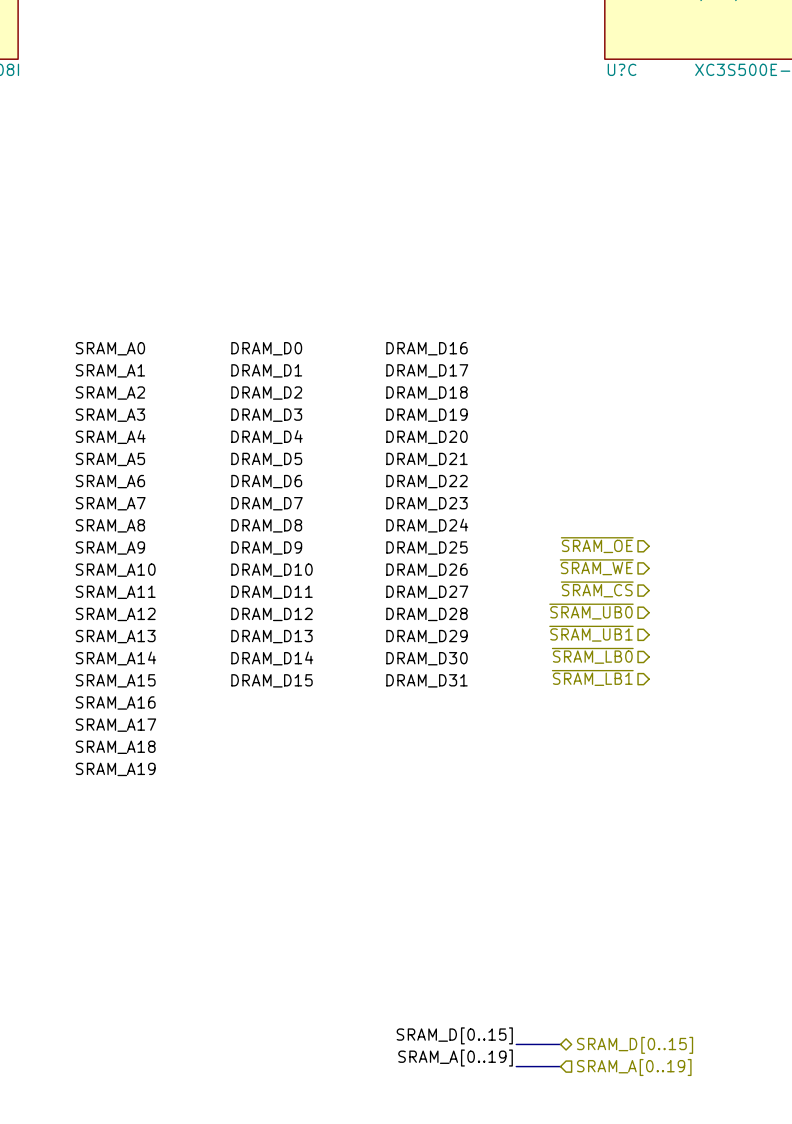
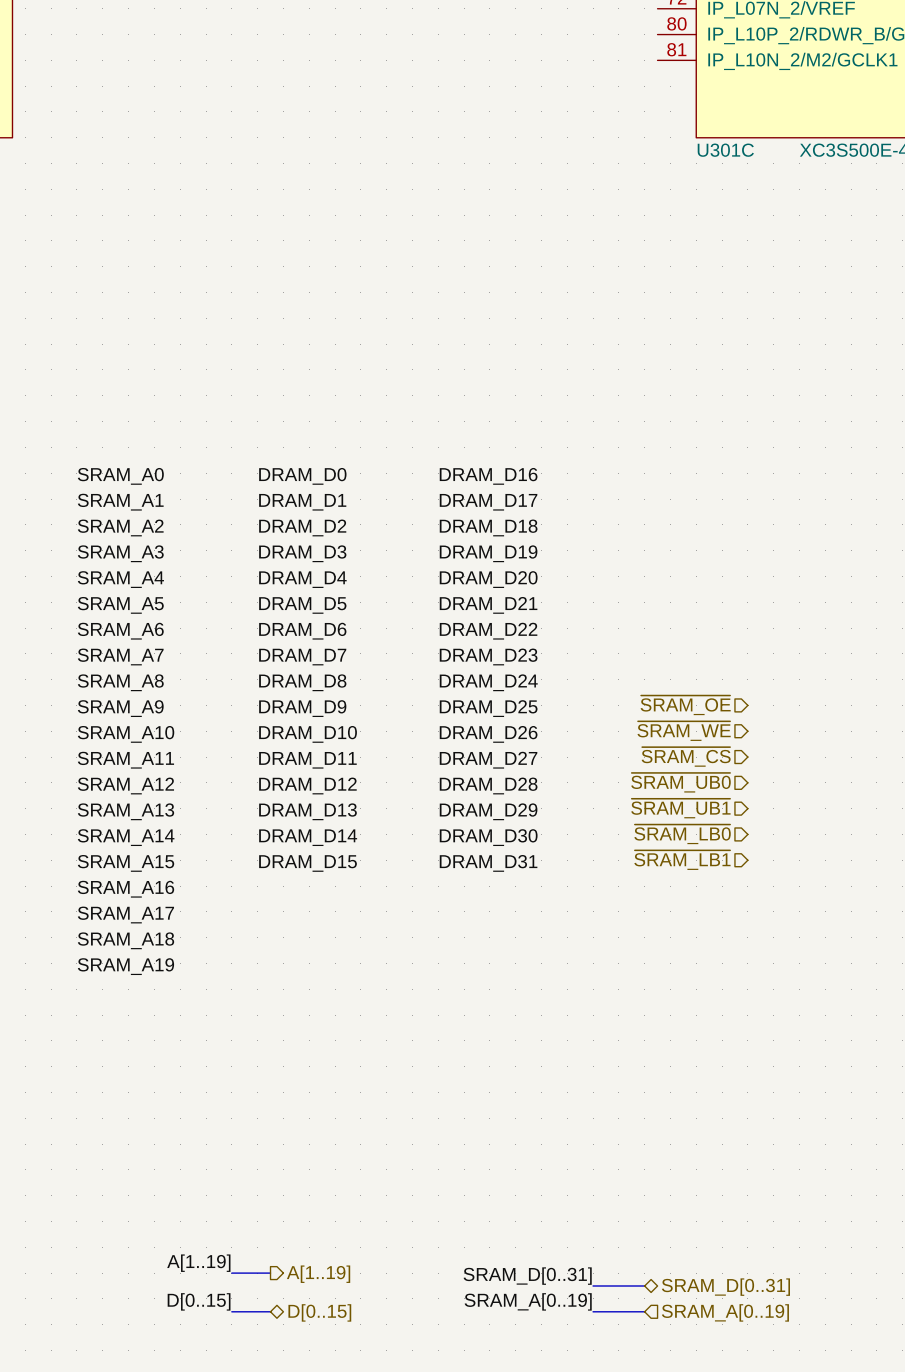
U?C name: U?C (622, 69) -> U301C (725, 150)
label: none -> A[1..19] (198, 1263)
bus: none -> (231, 1273) (270, 1273)
hierarchical label: none -> A[1..19] (318, 1274)
label: SRAM_D[0..15] (454, 1035) -> SRAM_D[0..31] (527, 1276)
hierarchical label: SRAM_D[0..15] (635, 1045) -> SRAM_D[0..31] (725, 1287)
label: none -> D[0..15] (199, 1301)
bus: none -> (231, 1311) (270, 1311)
hierarchical label: none -> D[0..15] (319, 1312)

